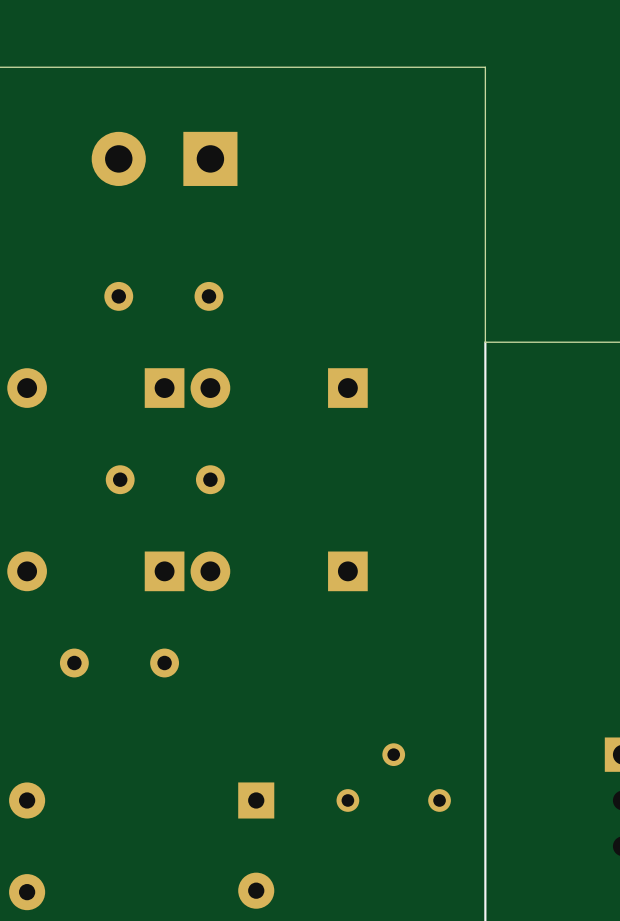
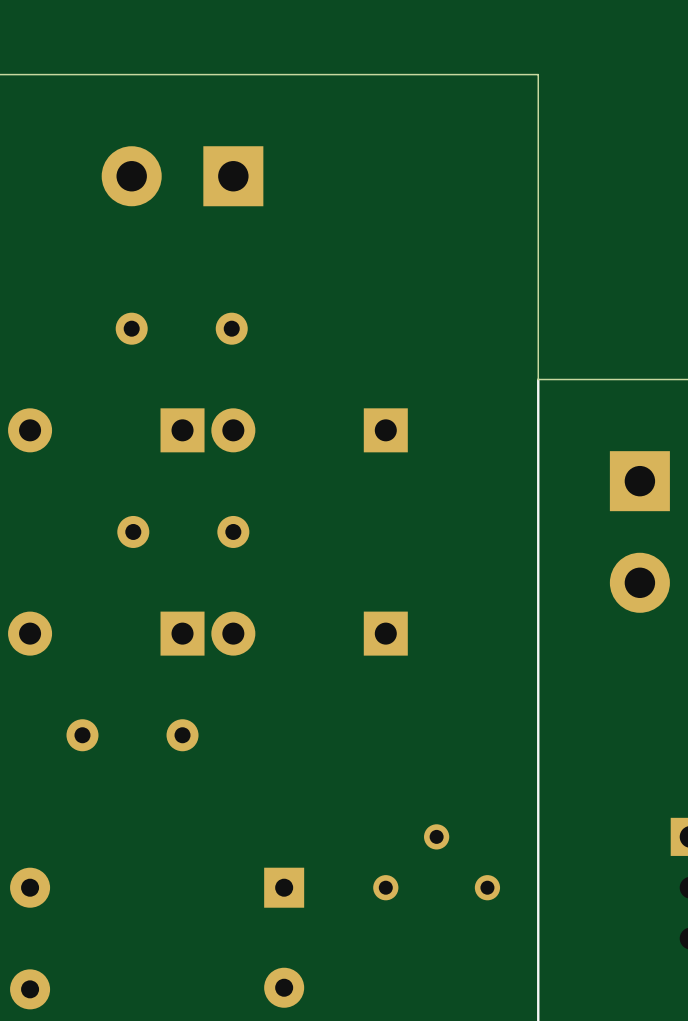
part: none -> (639, 531)

